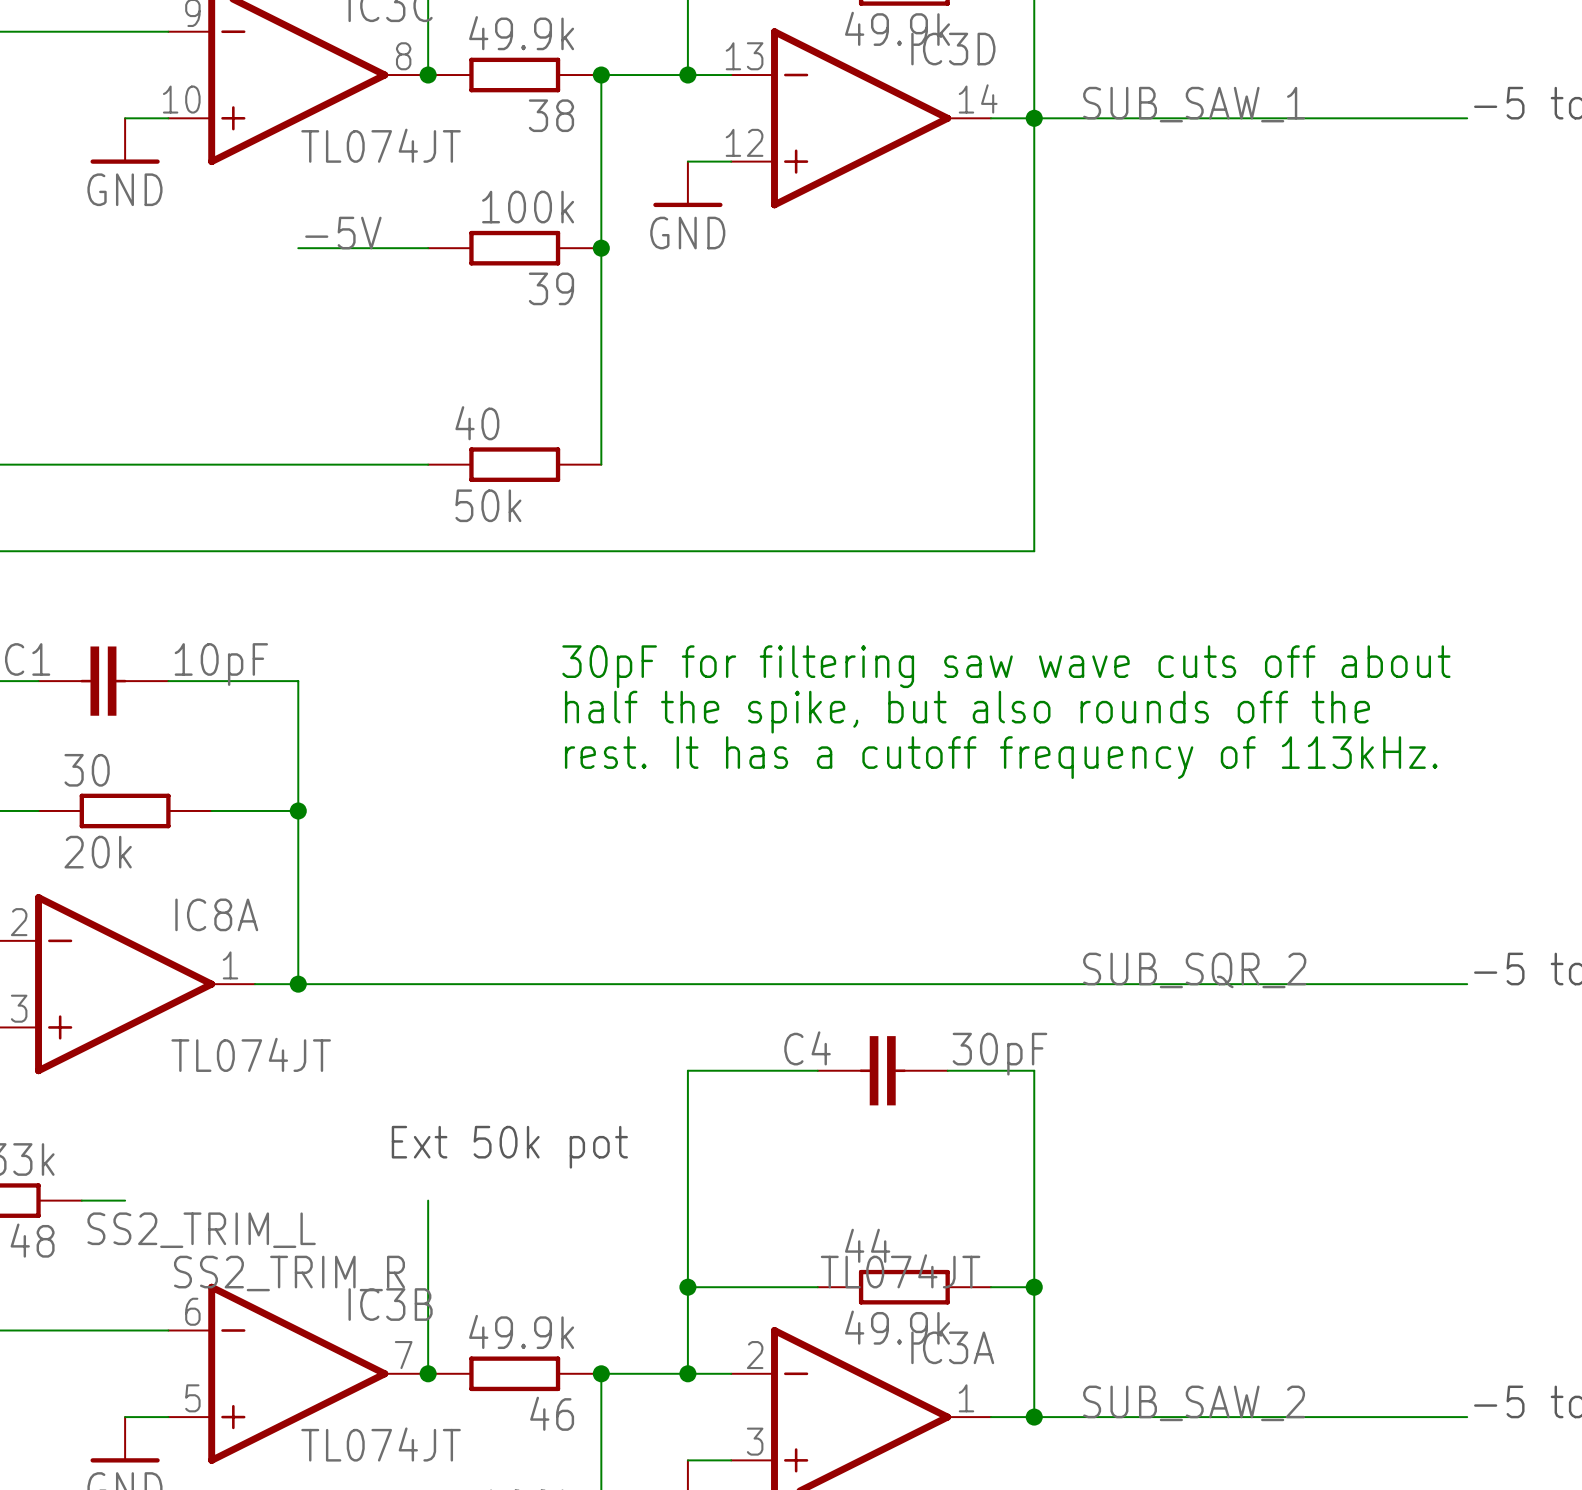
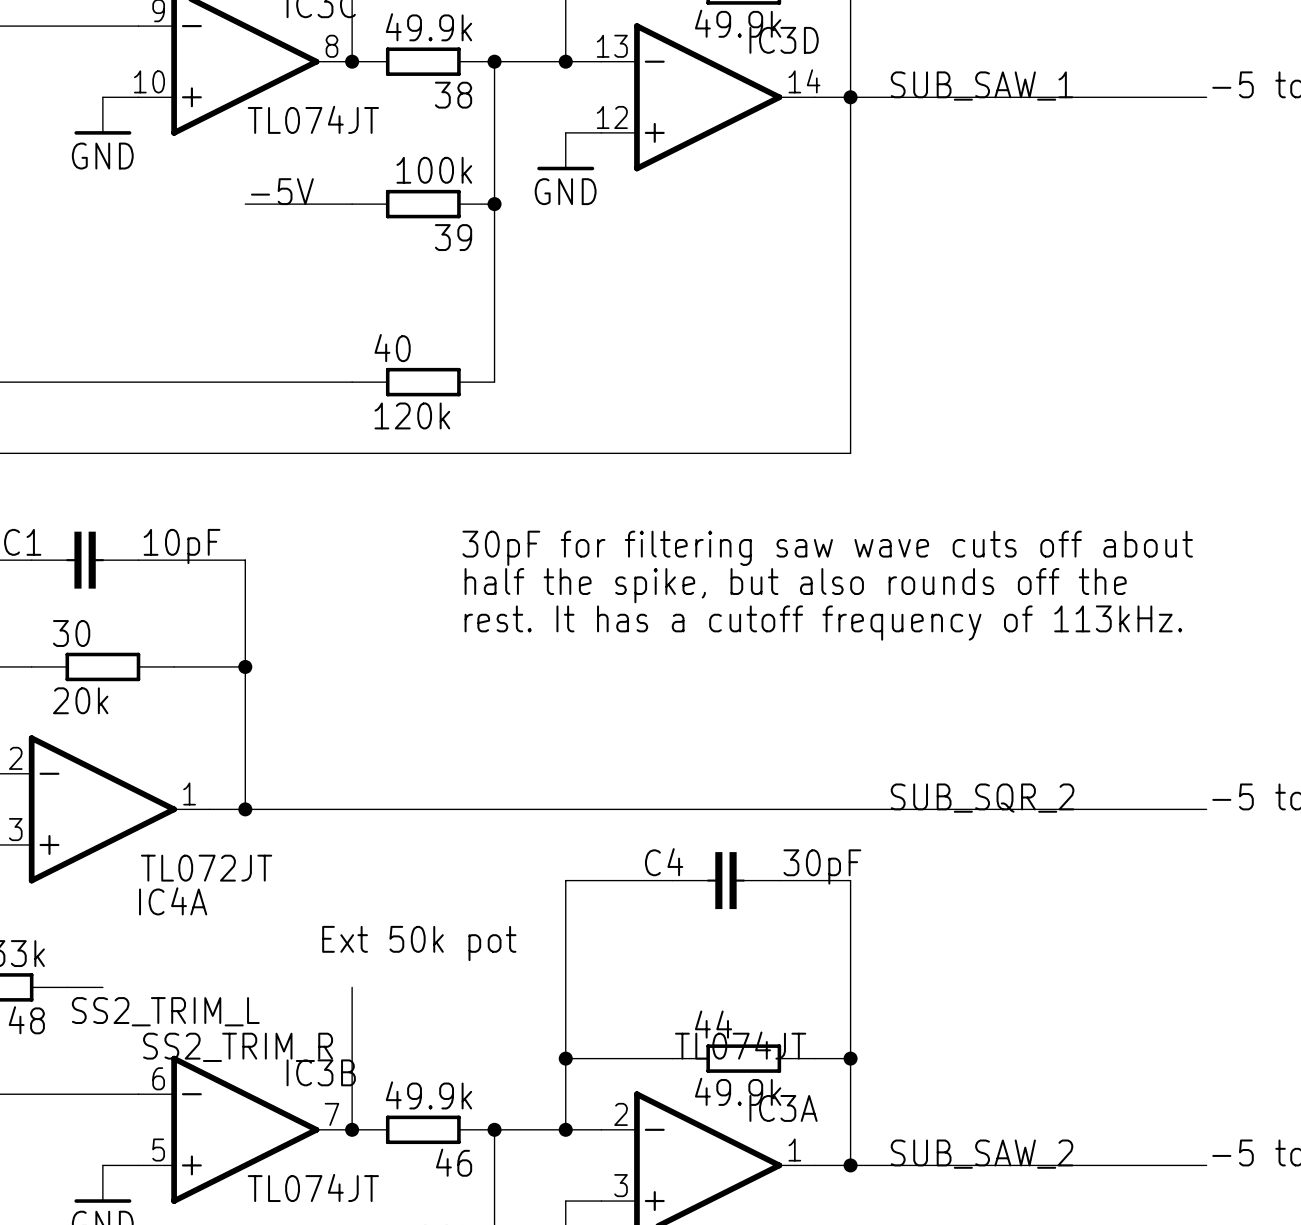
40 value: 50k (488, 505) -> 120k (412, 415)
IC8A name: IC8A (216, 914) -> IC4A (173, 901)
IC8A value: TL074JT (251, 1054) -> TL072JT (206, 868)

